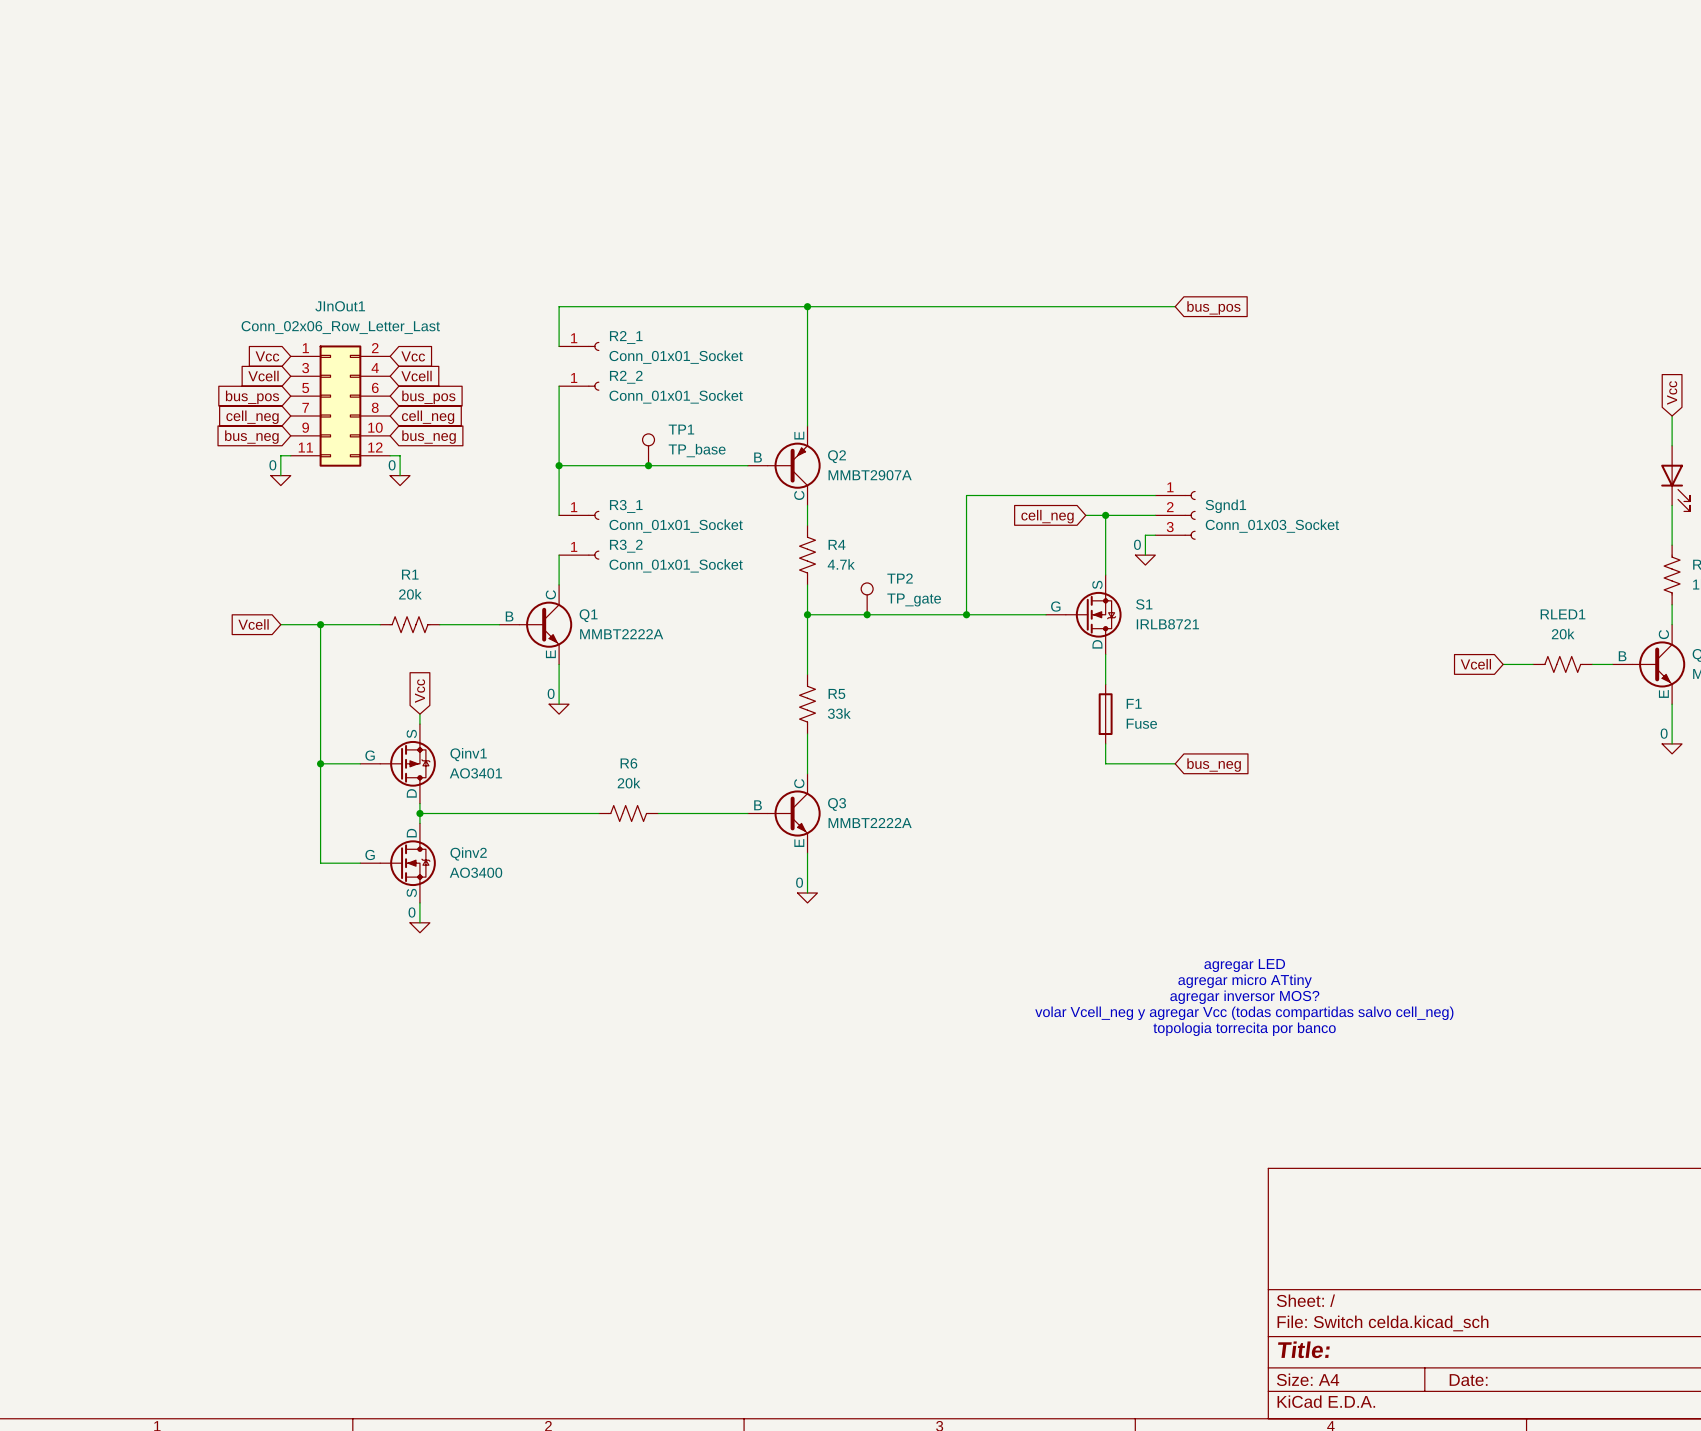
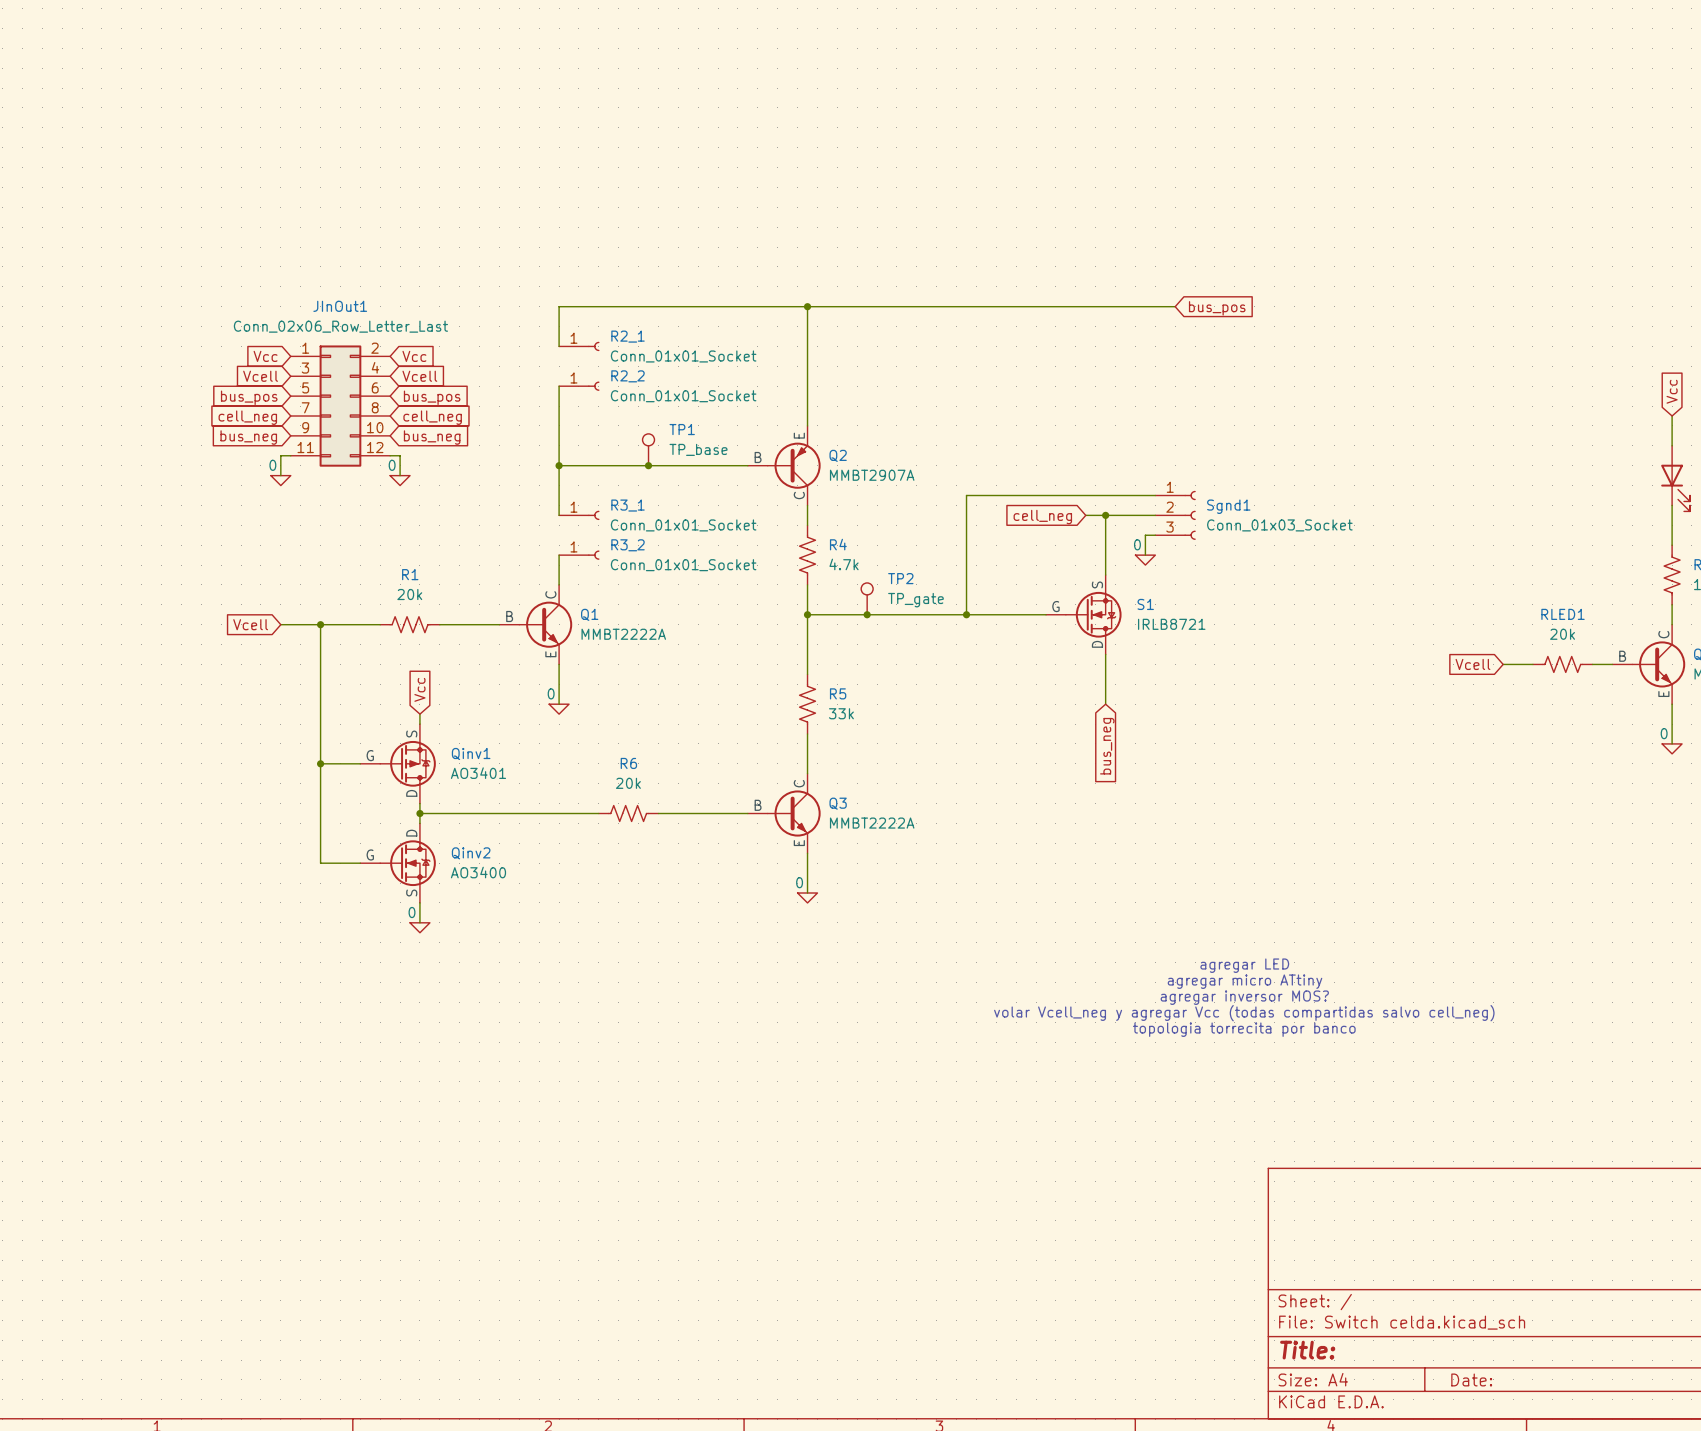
F1: Fuse (1105, 714) -> none
wire: (1105, 743) (1105, 763) (1175, 763) -> none
global label rotation: 0° (1214, 765) -> 90° clockwise (1107, 746)
global label position: bus_neg (1214, 765) -> bus_neg (1107, 746)

